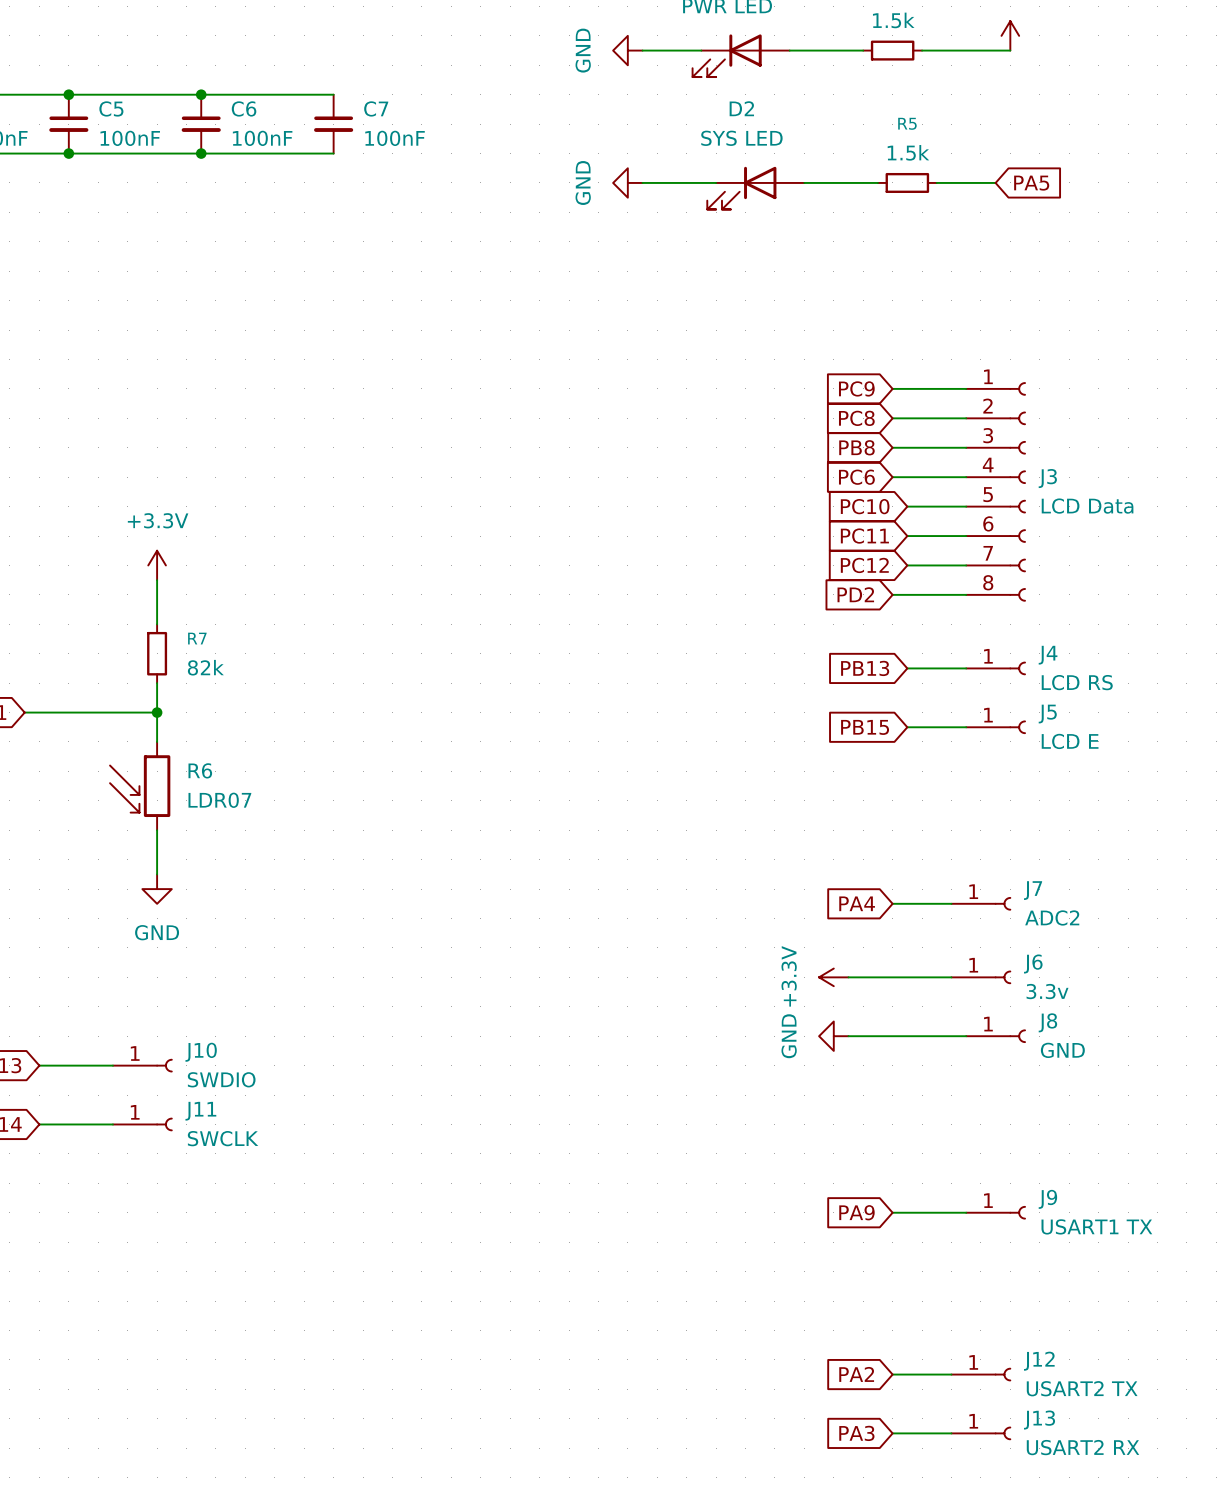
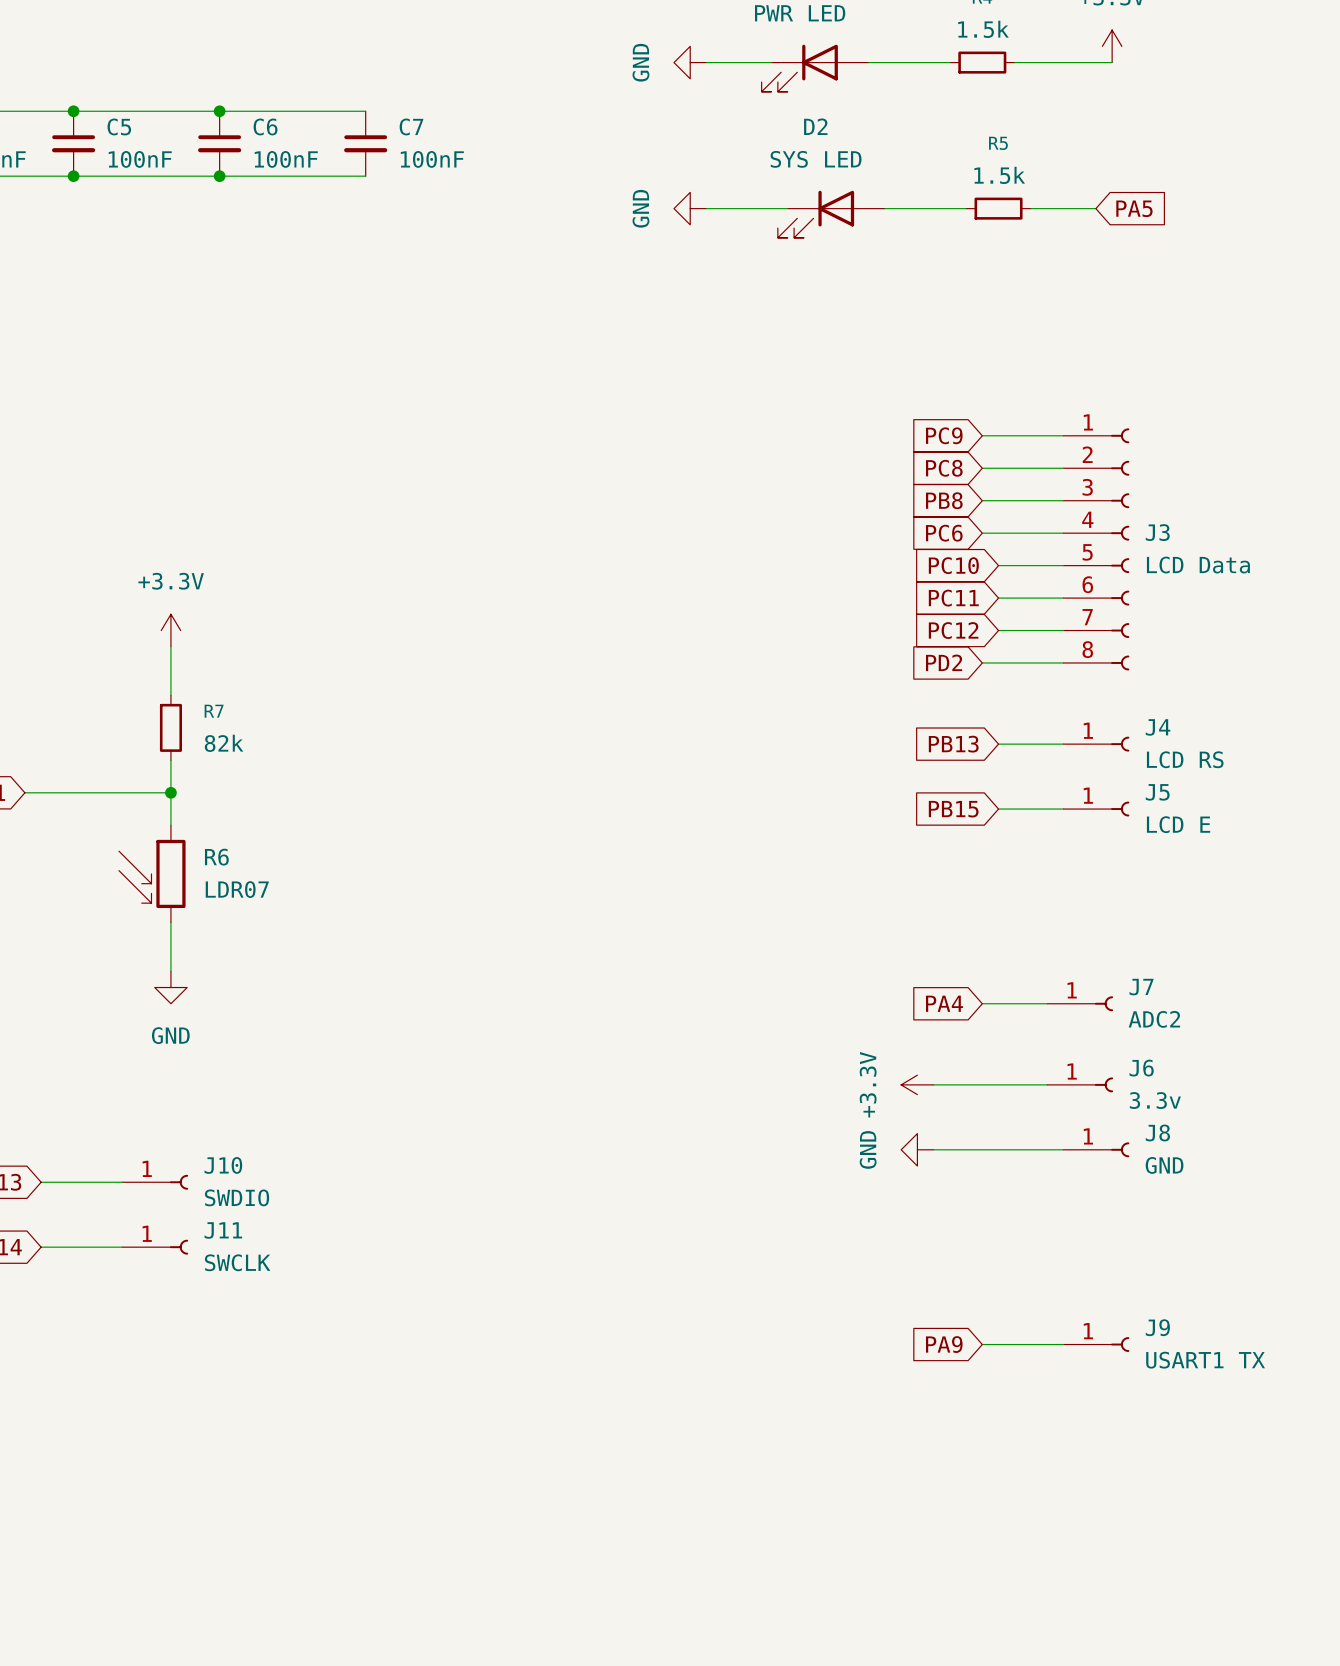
global label: PA2 (856, 1374) -> none
wire: (892, 1374) (951, 1374) -> none
J12: USART2 TX (981, 1374) -> none
global label: PA3 (856, 1433) -> none
wire: (892, 1433) (951, 1433) -> none
J13: USART2 RX (981, 1433) -> none

